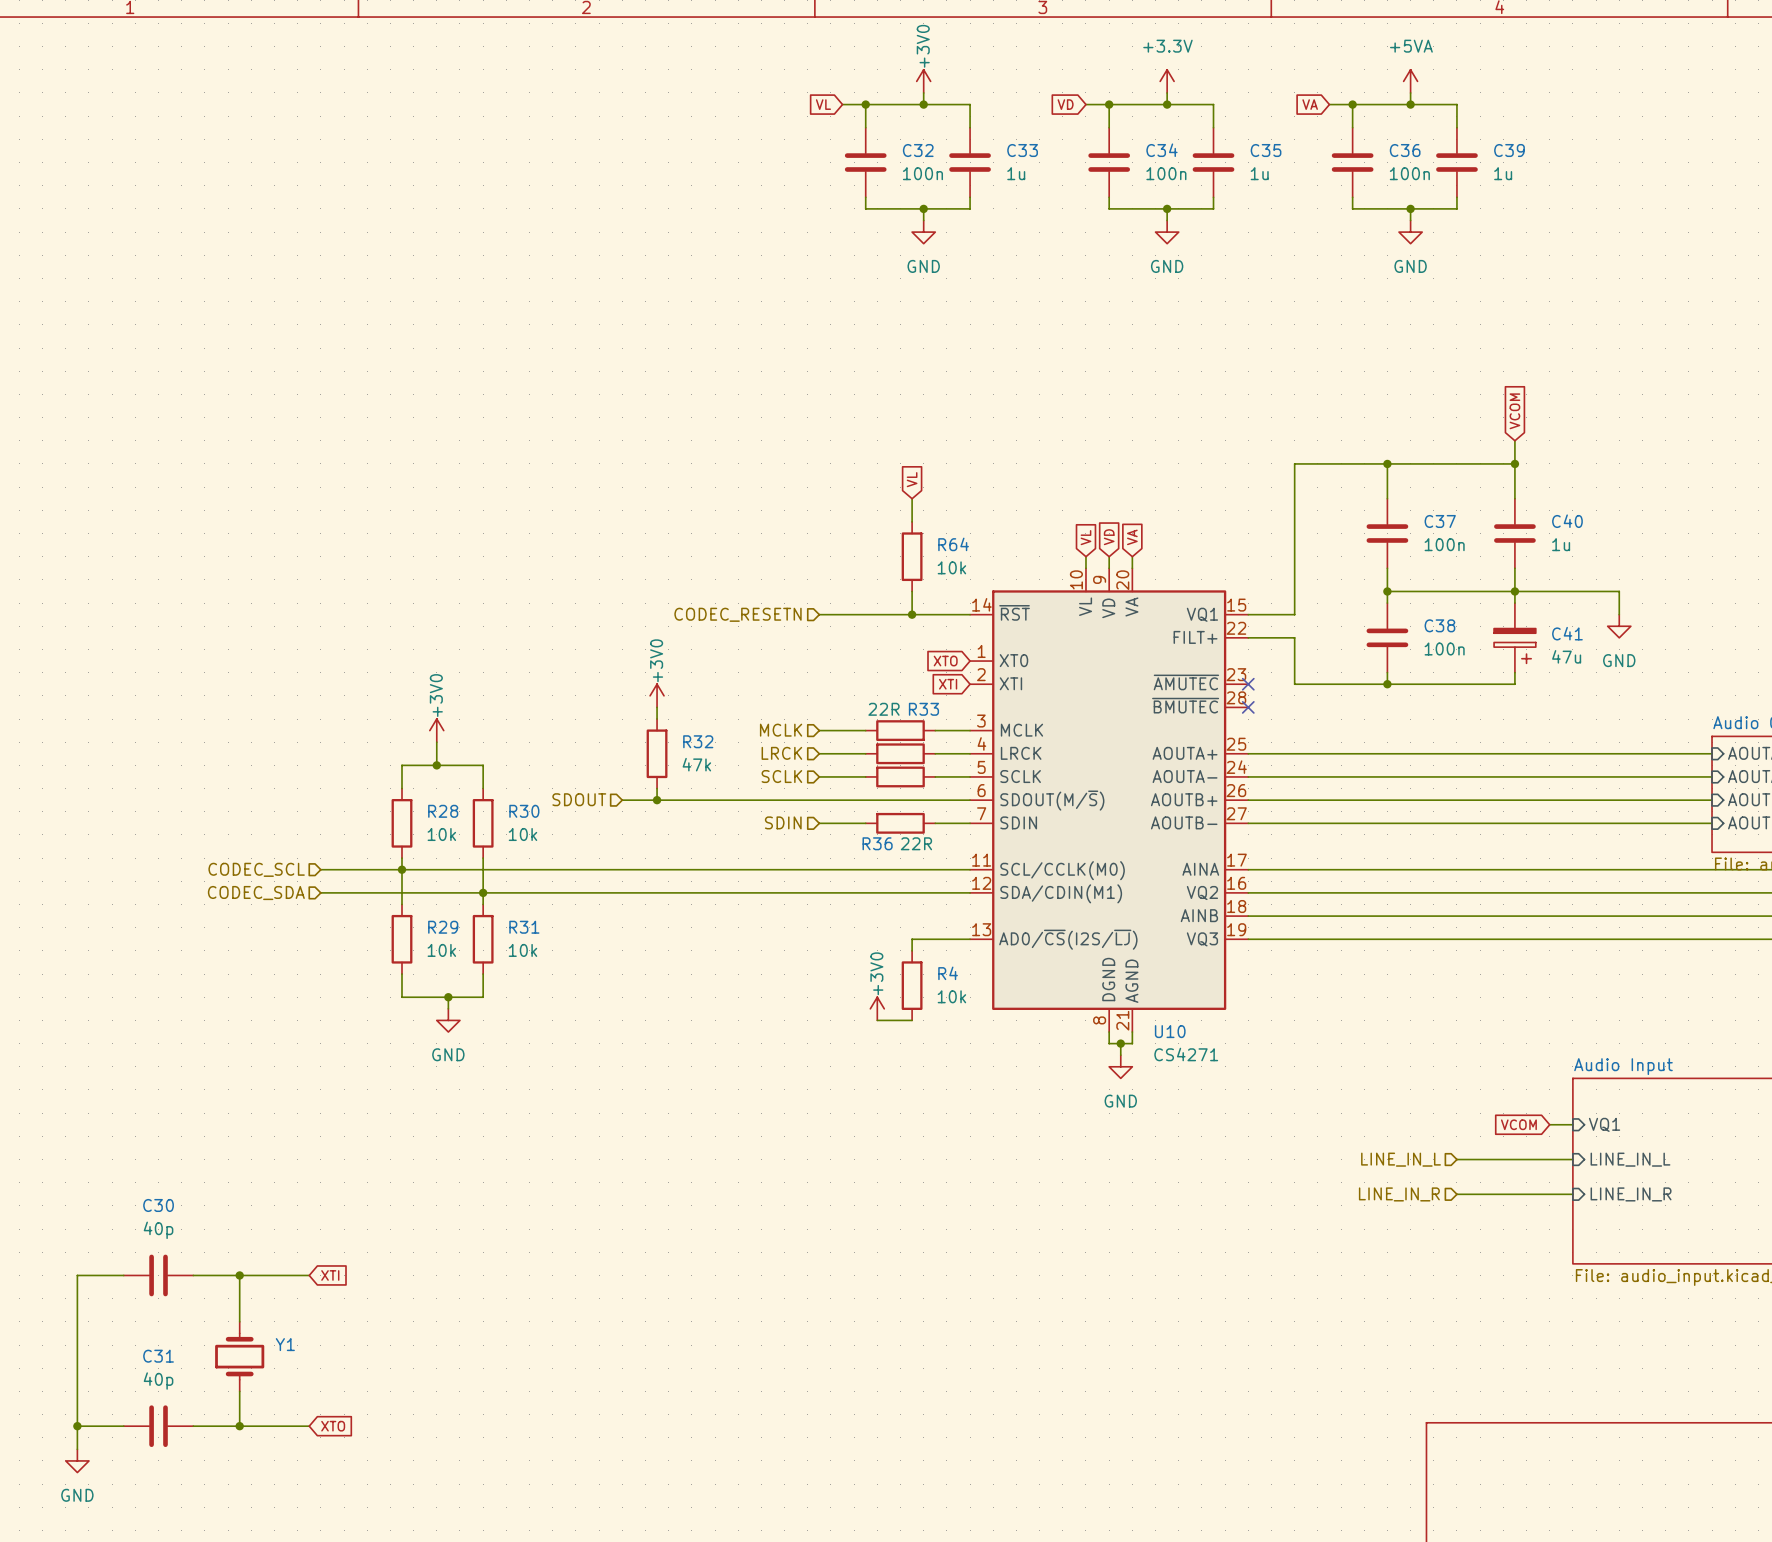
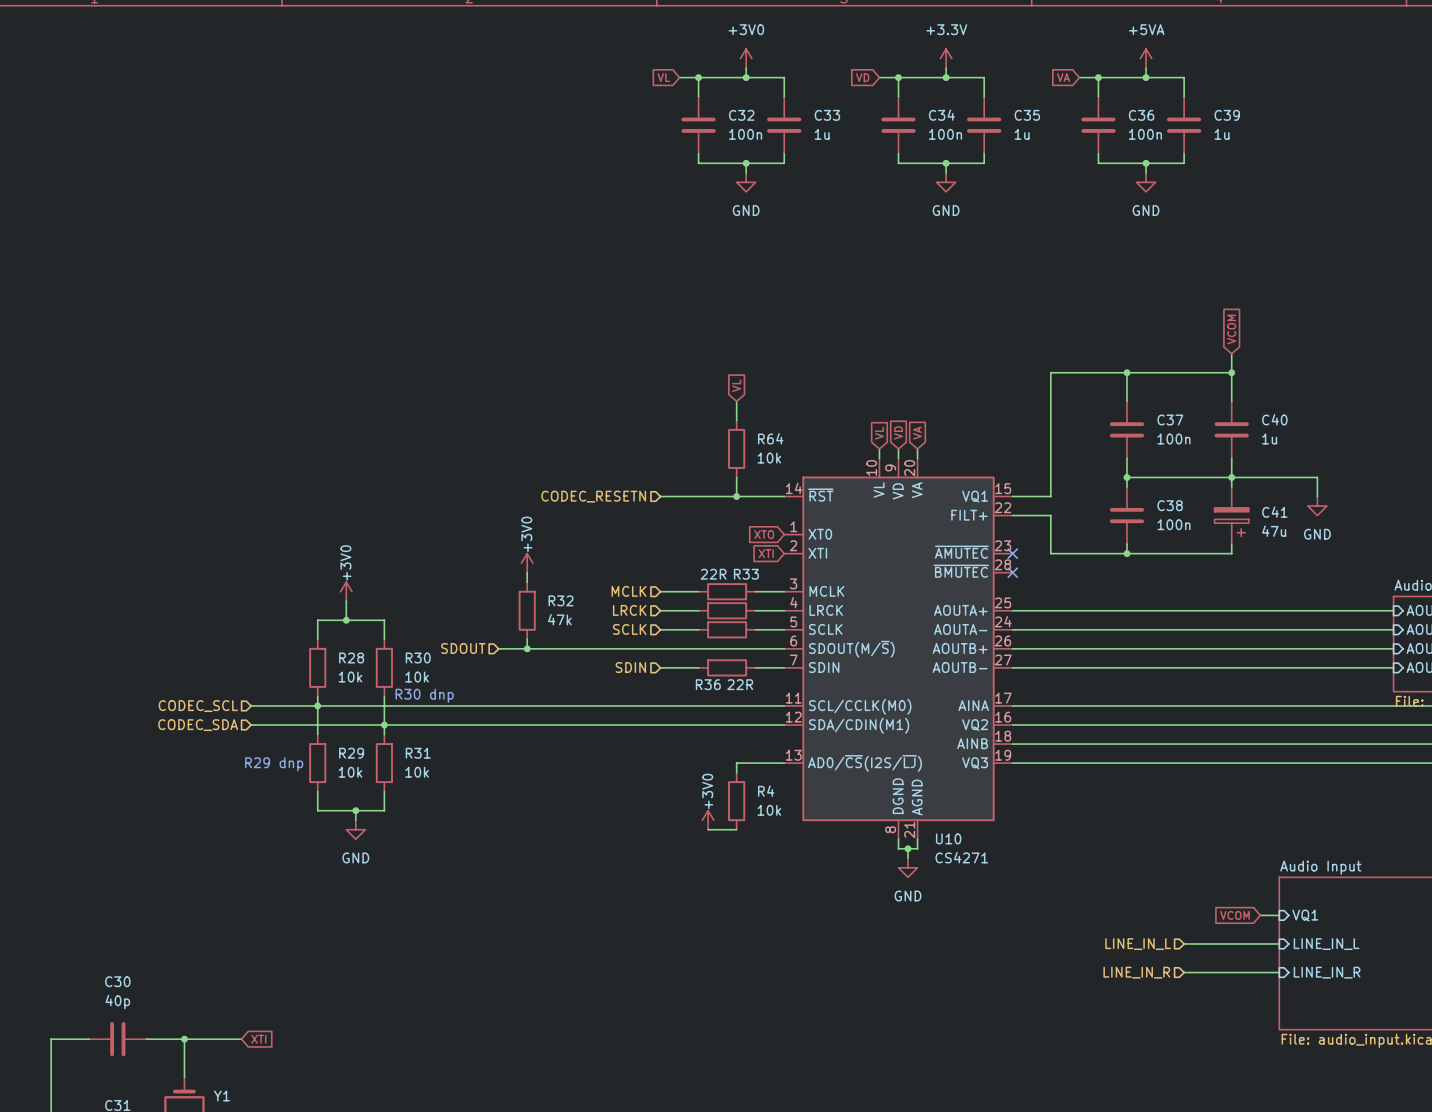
power symbol text rotation: 0° (923, 46) -> 90° clockwise (746, 29)
text: none -> R30 dnp (424, 695)
text: none -> R29 dnp (274, 764)

